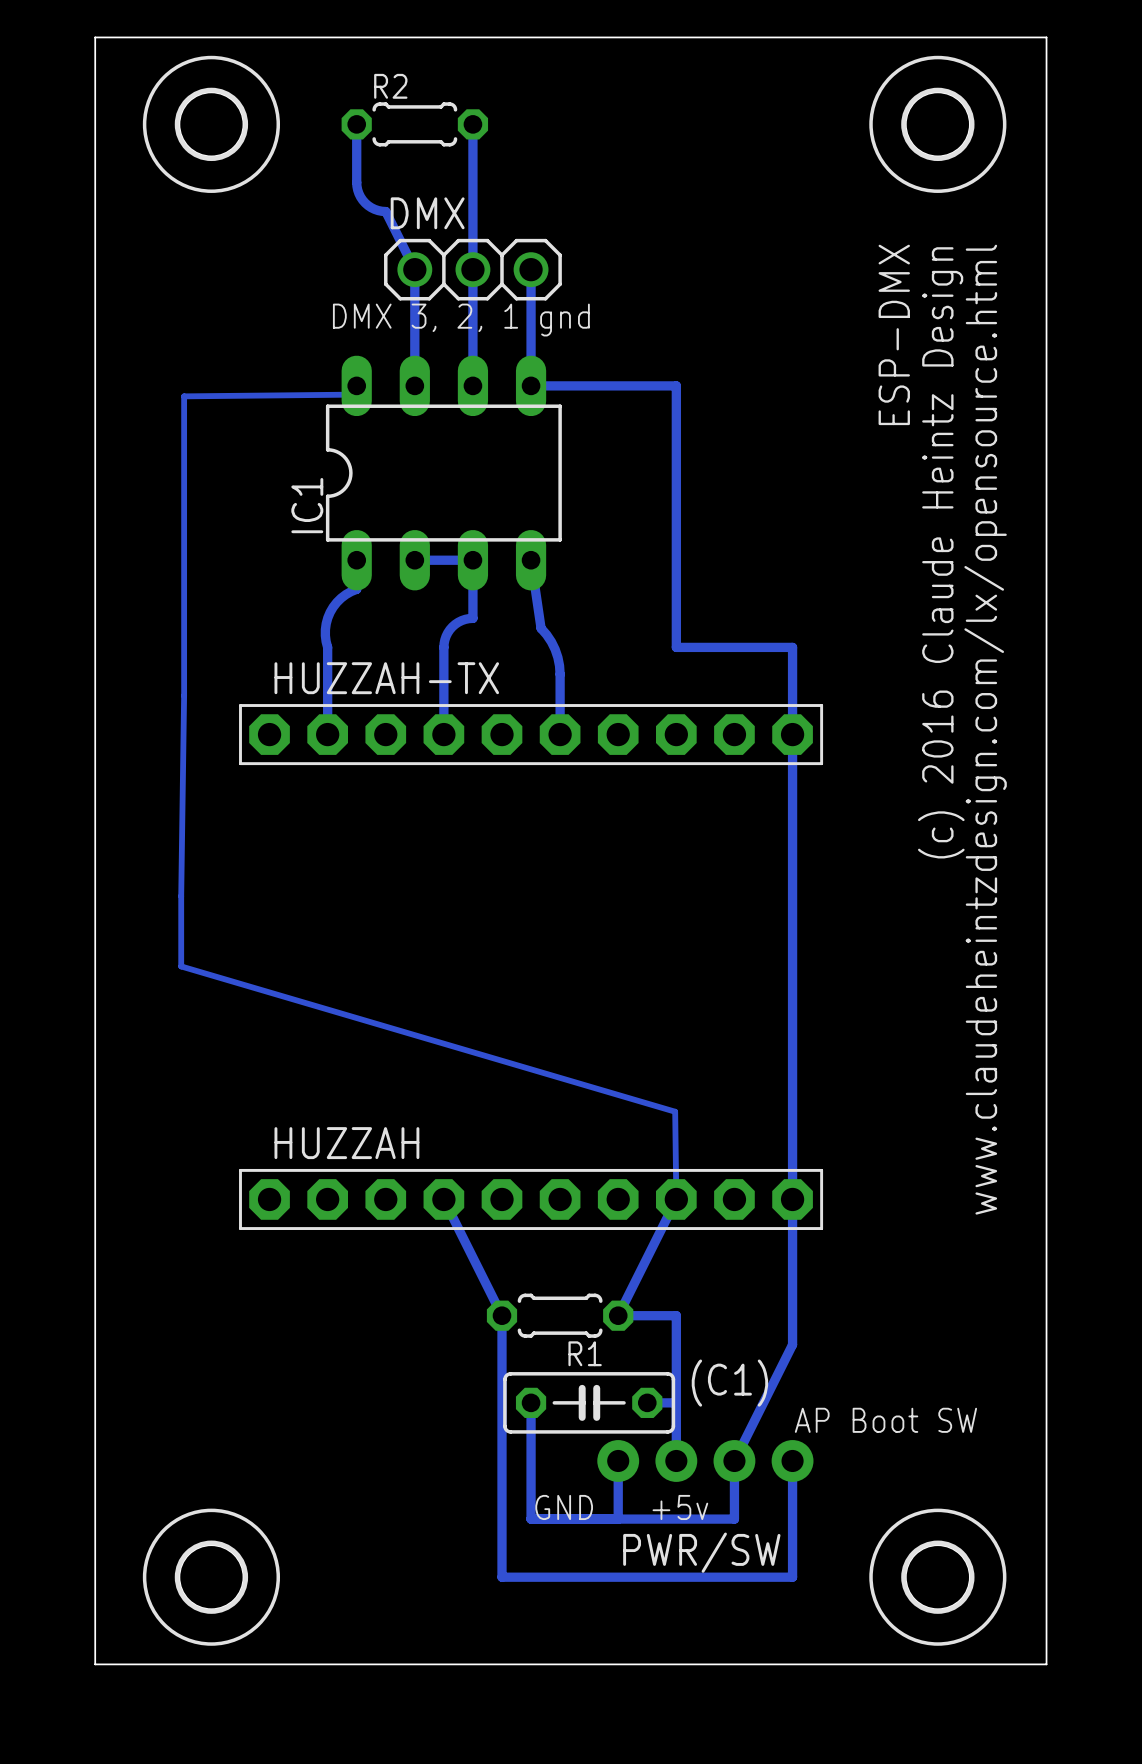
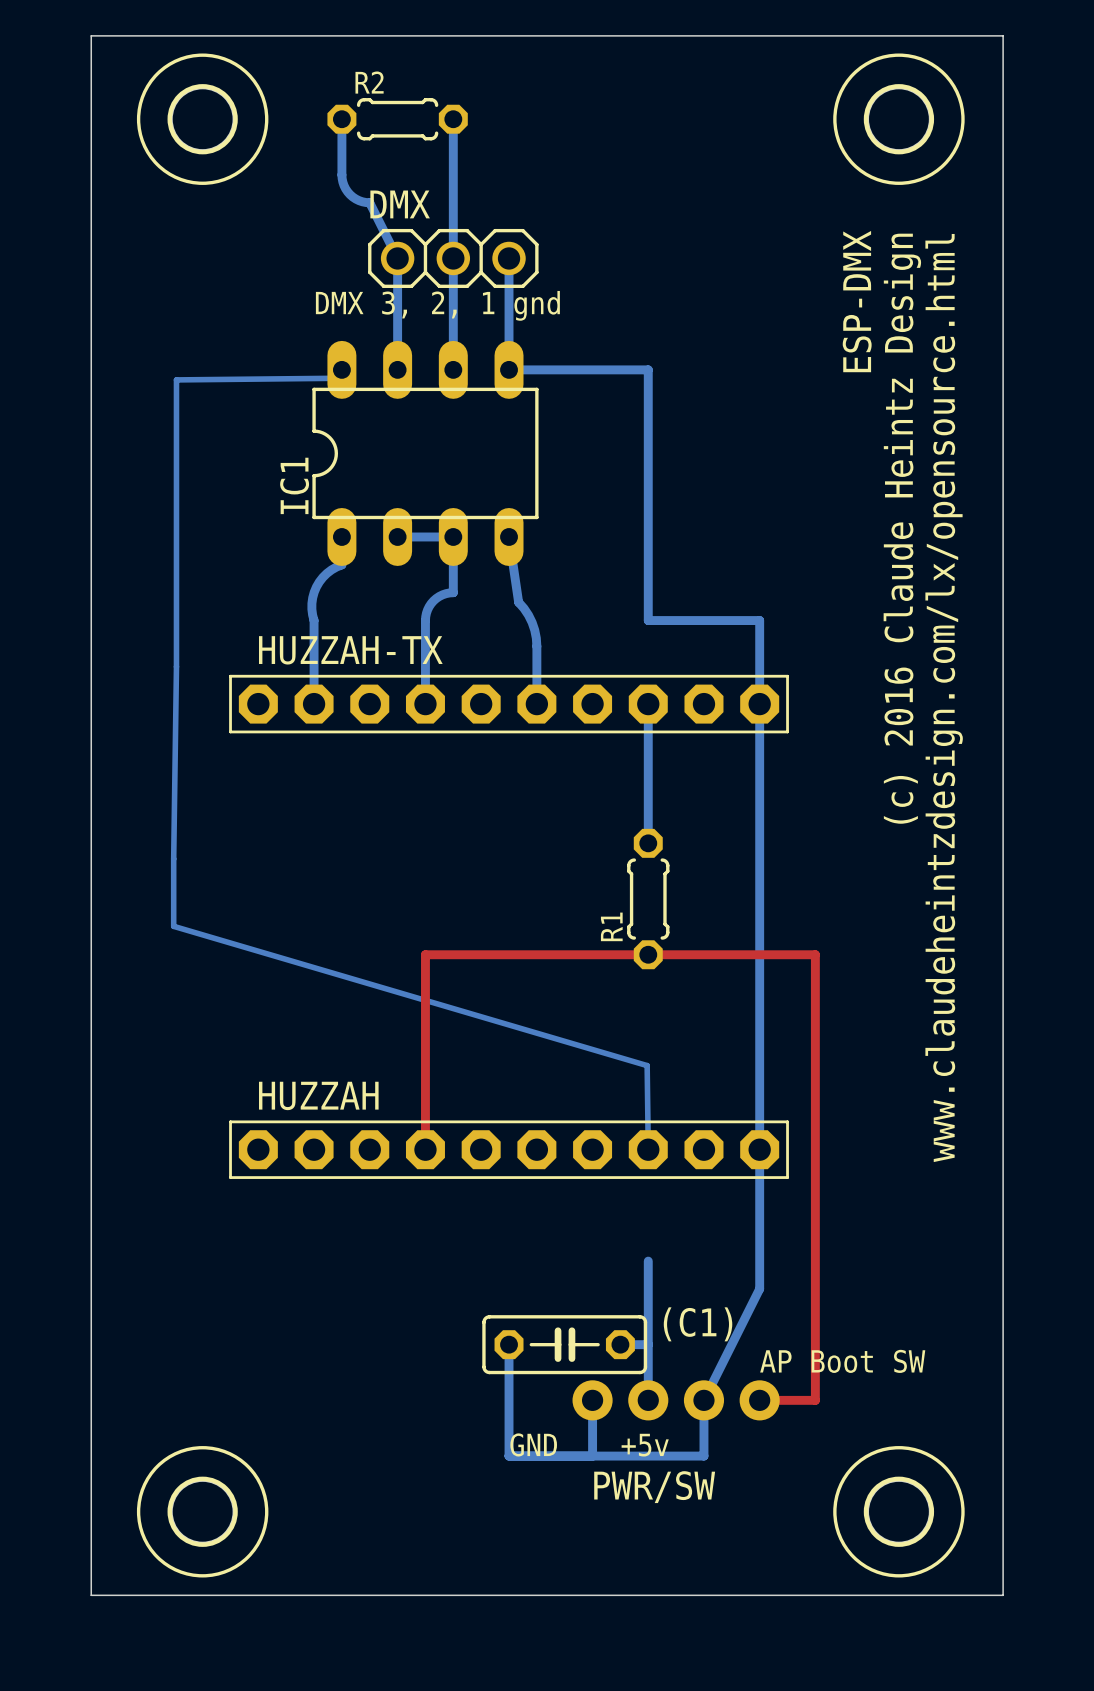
bottom track: none -> (648, 704) (648, 843)
bottom track: (443, 1199) (502, 1315) (502, 1577) (792, 1577) (792, 1460) -> none
top track: none -> (425, 1149) (425, 954) (815, 954) (815, 1400) (759, 1400)
bottom track: (676, 1199) (618, 1315) (676, 1315) -> none
R1 rotation: 0° (560, 1315) -> 90° clockwise (648, 899)
R1 position: (560, 1315) -> (648, 899)

